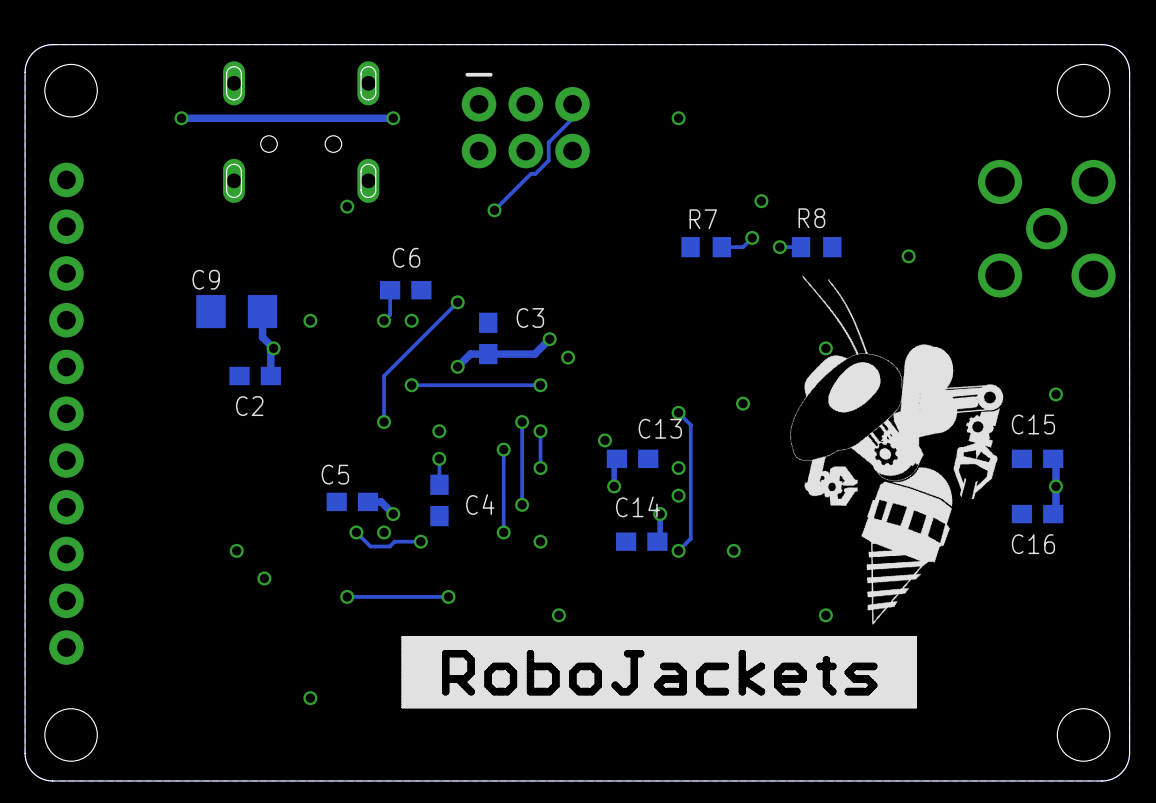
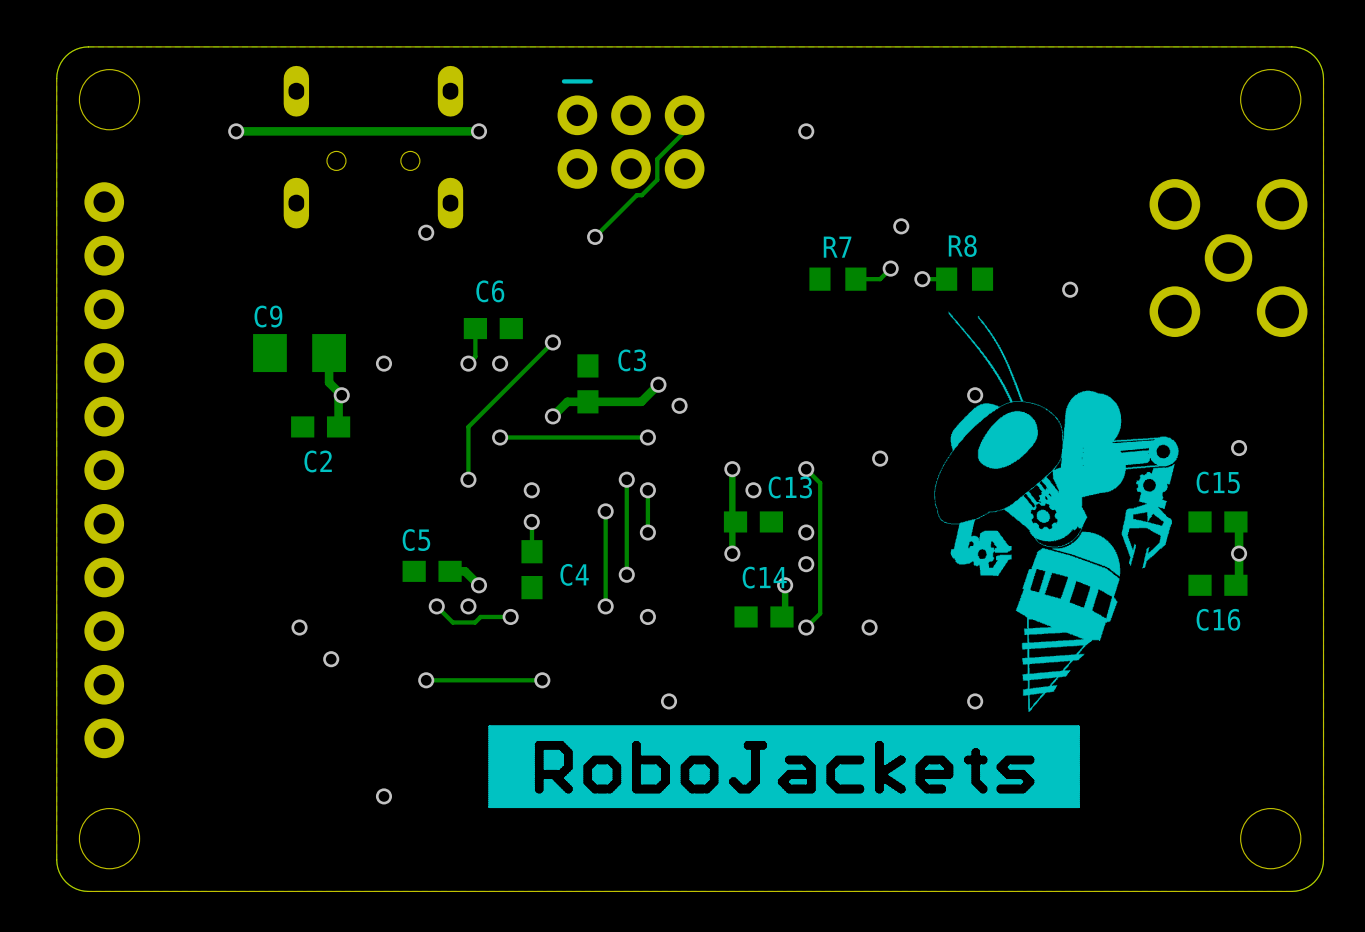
track: none -> (732, 469) (732, 521)
via: none -> (732, 469)
via: none -> (753, 490)
via: (604, 440) -> none

